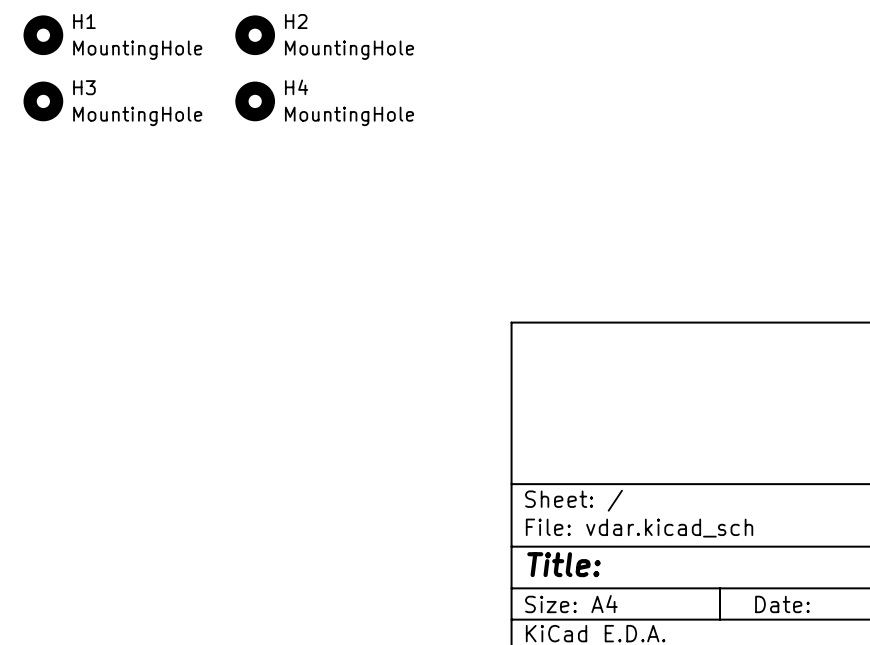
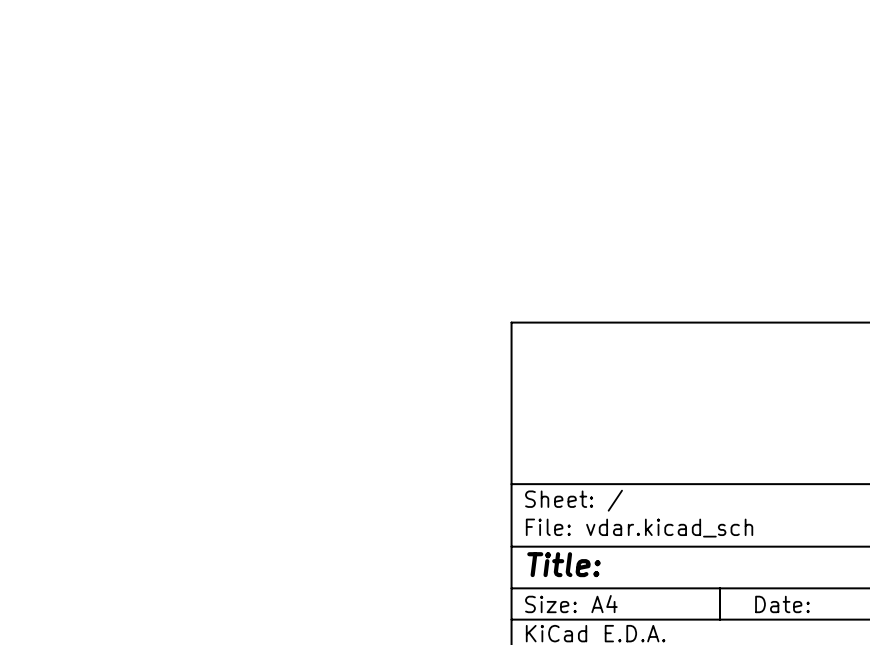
H1: MountingHole (43, 35) -> none
H2: MountingHole (255, 35) -> none
H3: MountingHole (43, 101) -> none
H4: MountingHole (255, 101) -> none

